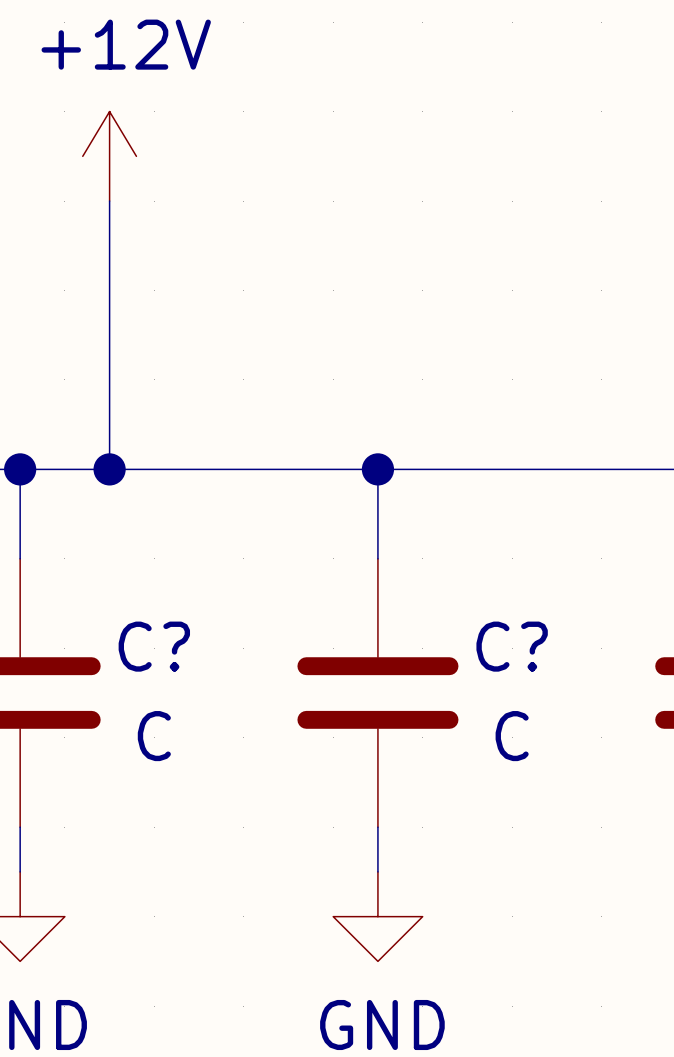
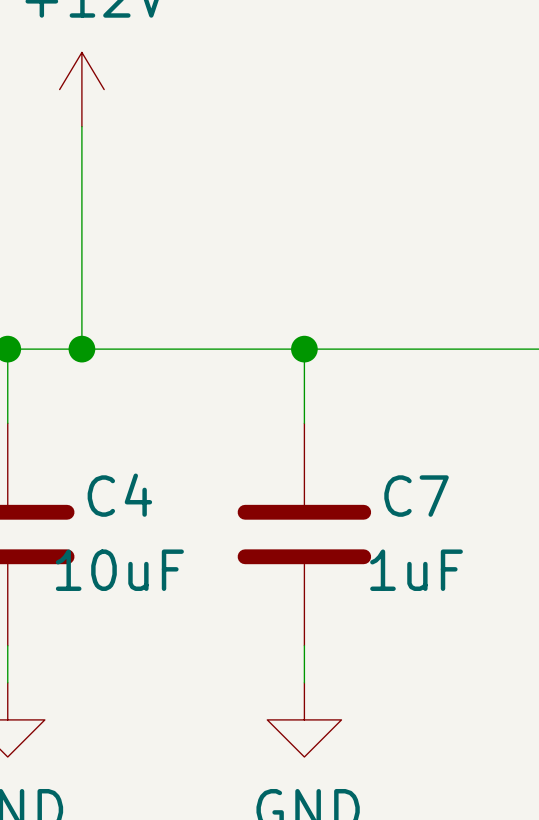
C? name: C? (154, 646) -> C4 (119, 495)
C? name: C? (512, 646) -> C7 (416, 496)
C? value: C (154, 736) -> 10uF (119, 570)
C? value: C (512, 736) -> 1uF (416, 570)

